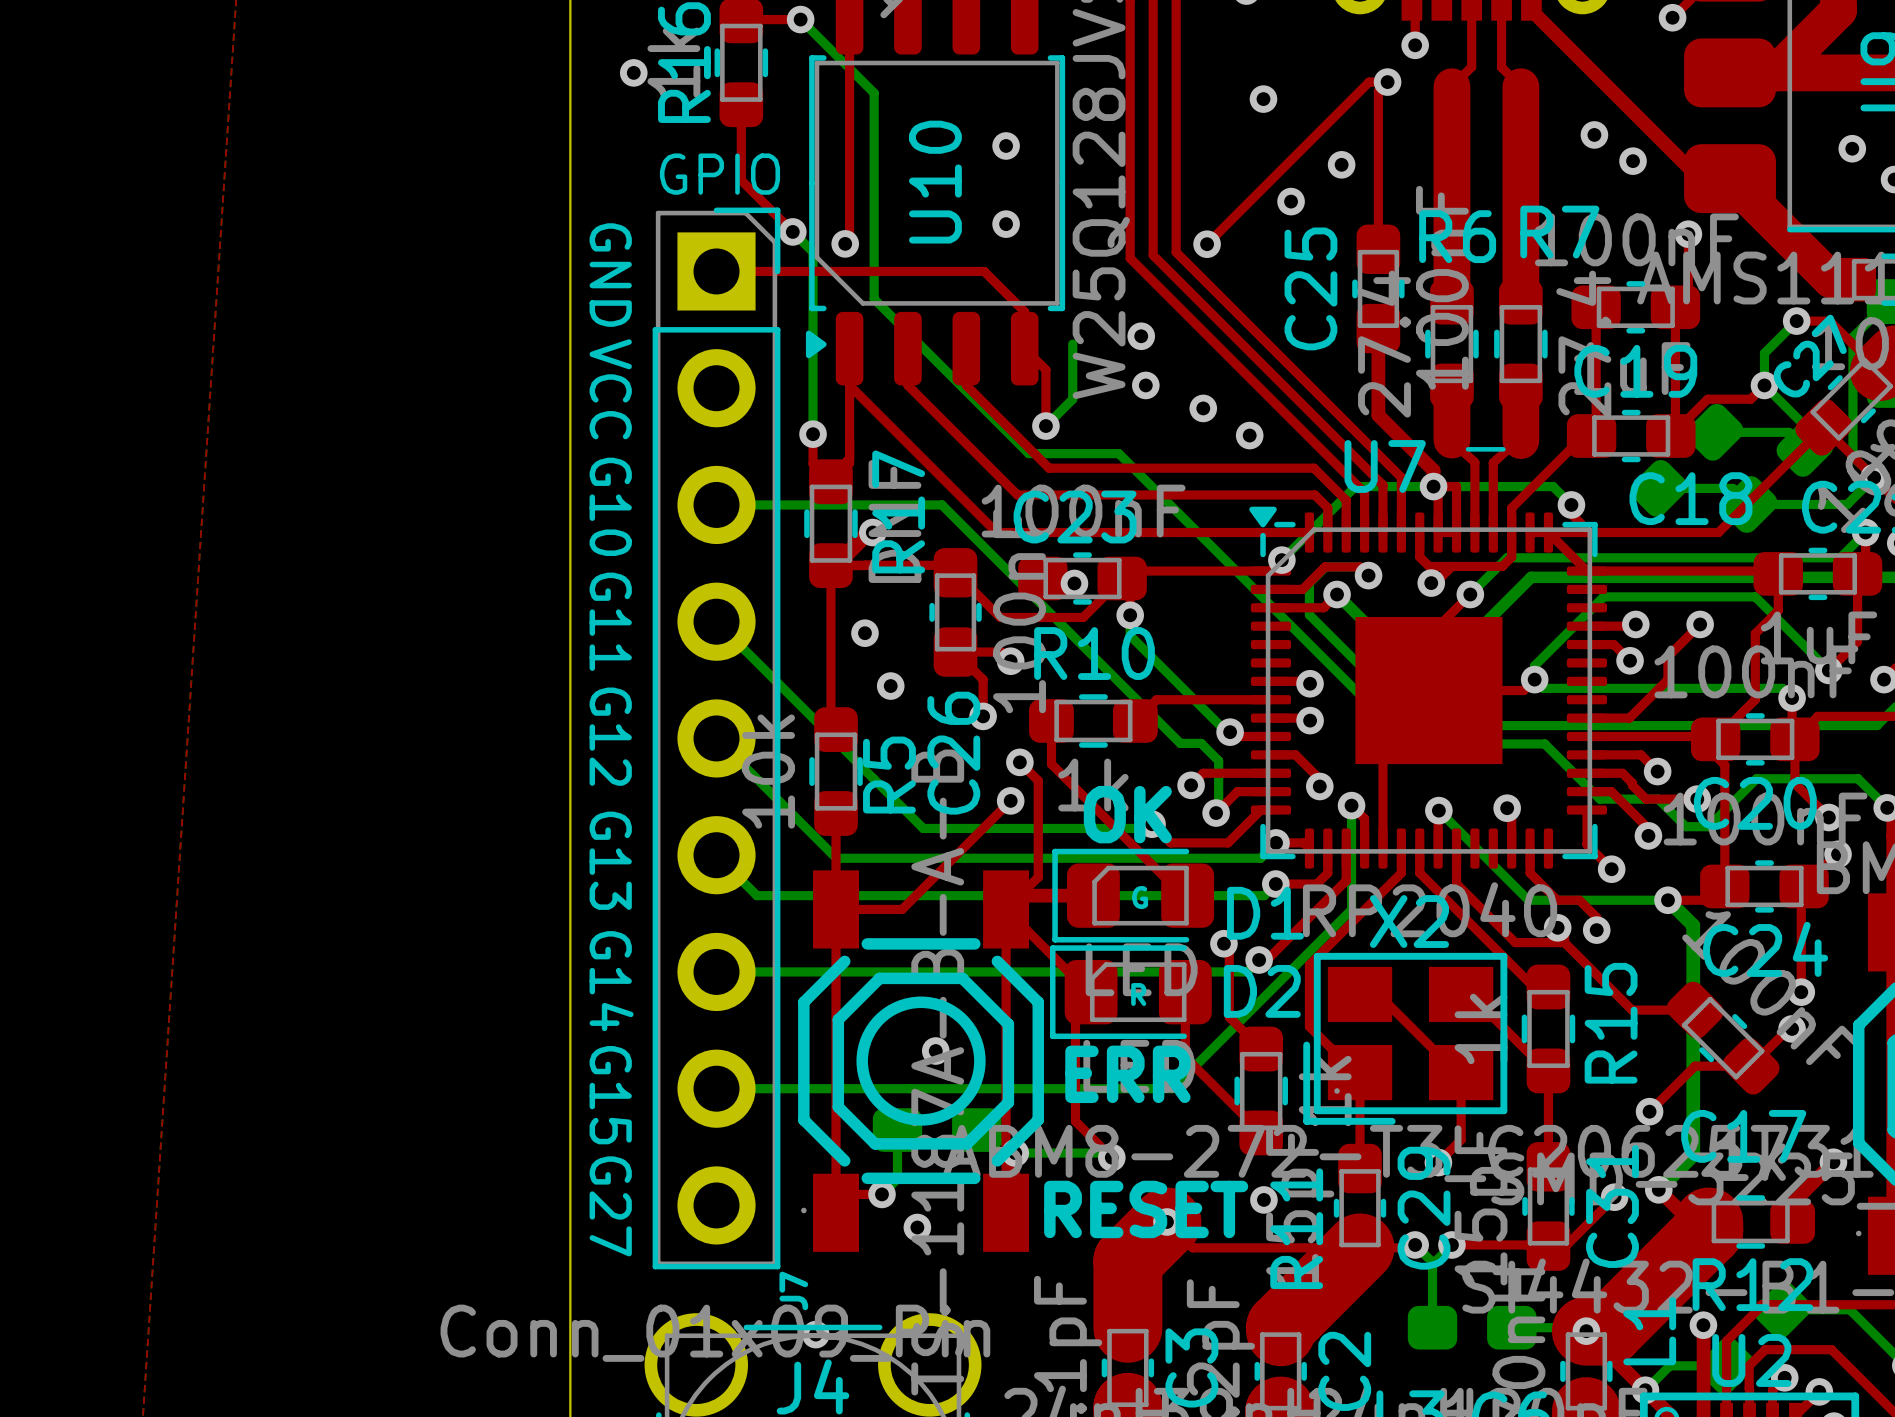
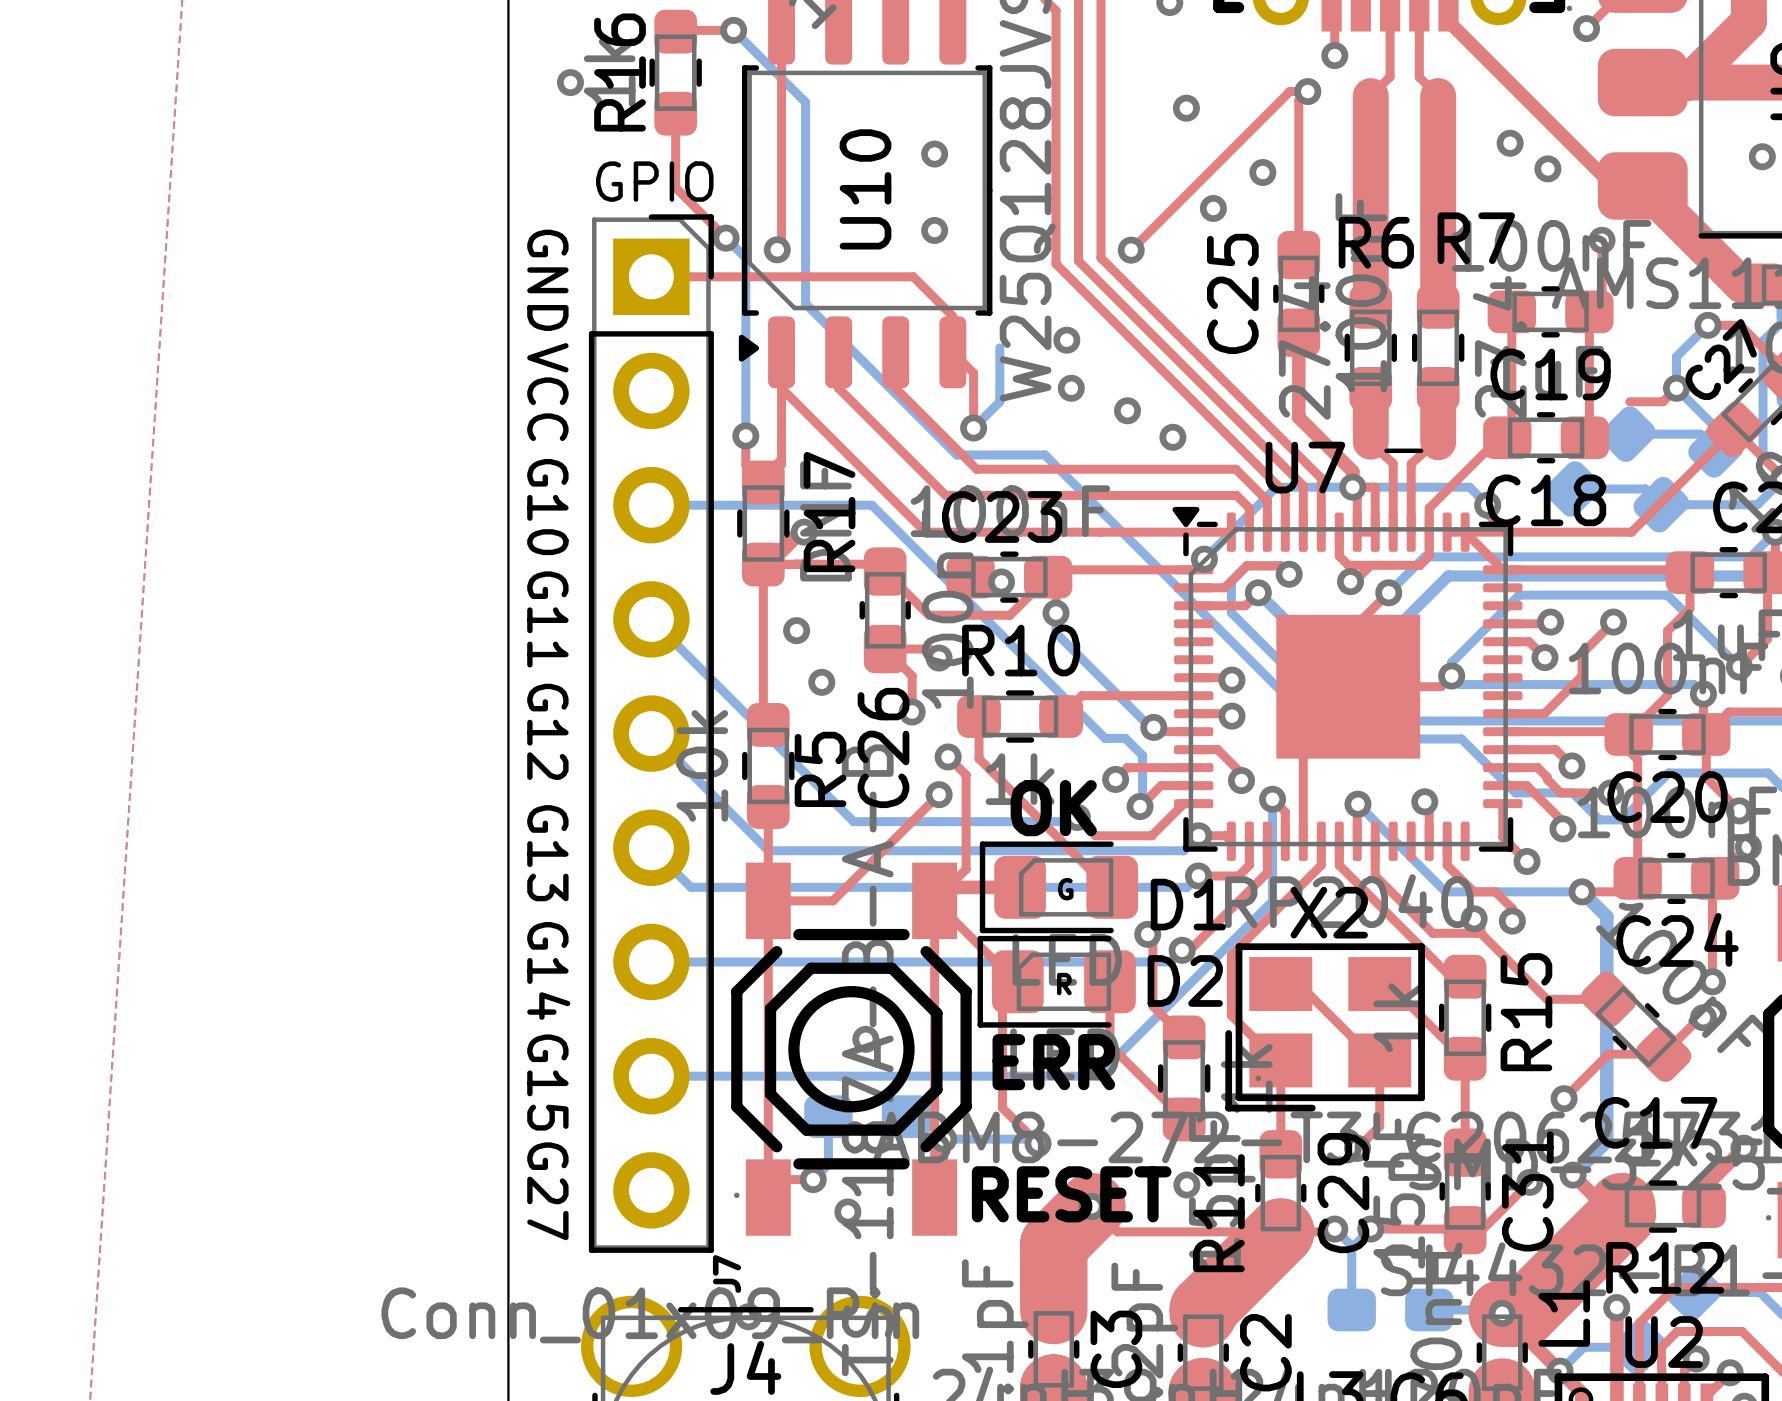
top track: (1716, 399) (1707, 399) (1675, 431) -> none
C18 name position: C18 (1690, 498) -> C18 (1546, 500)

